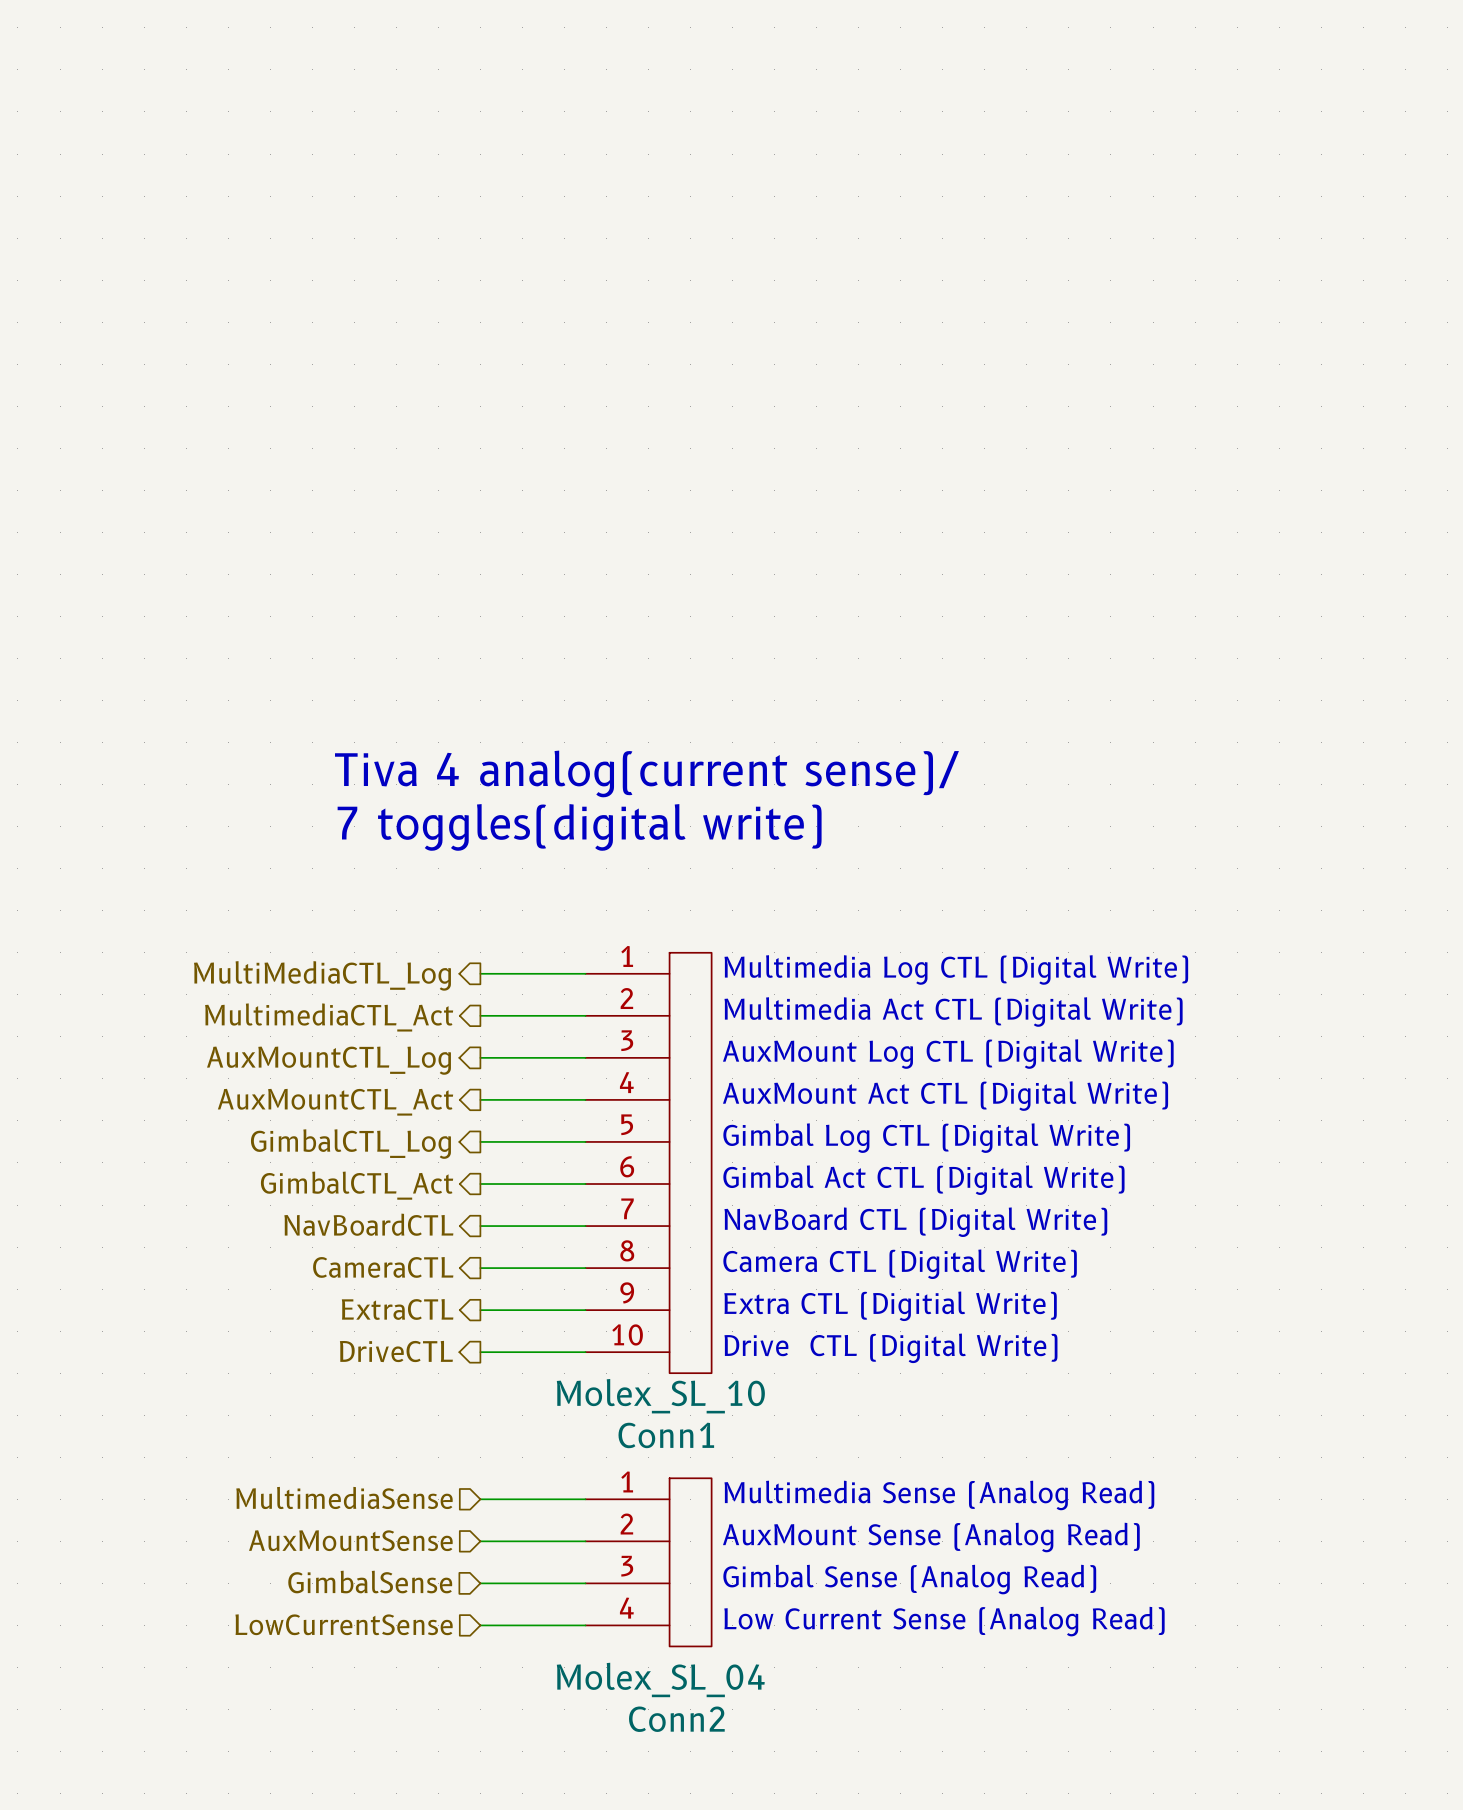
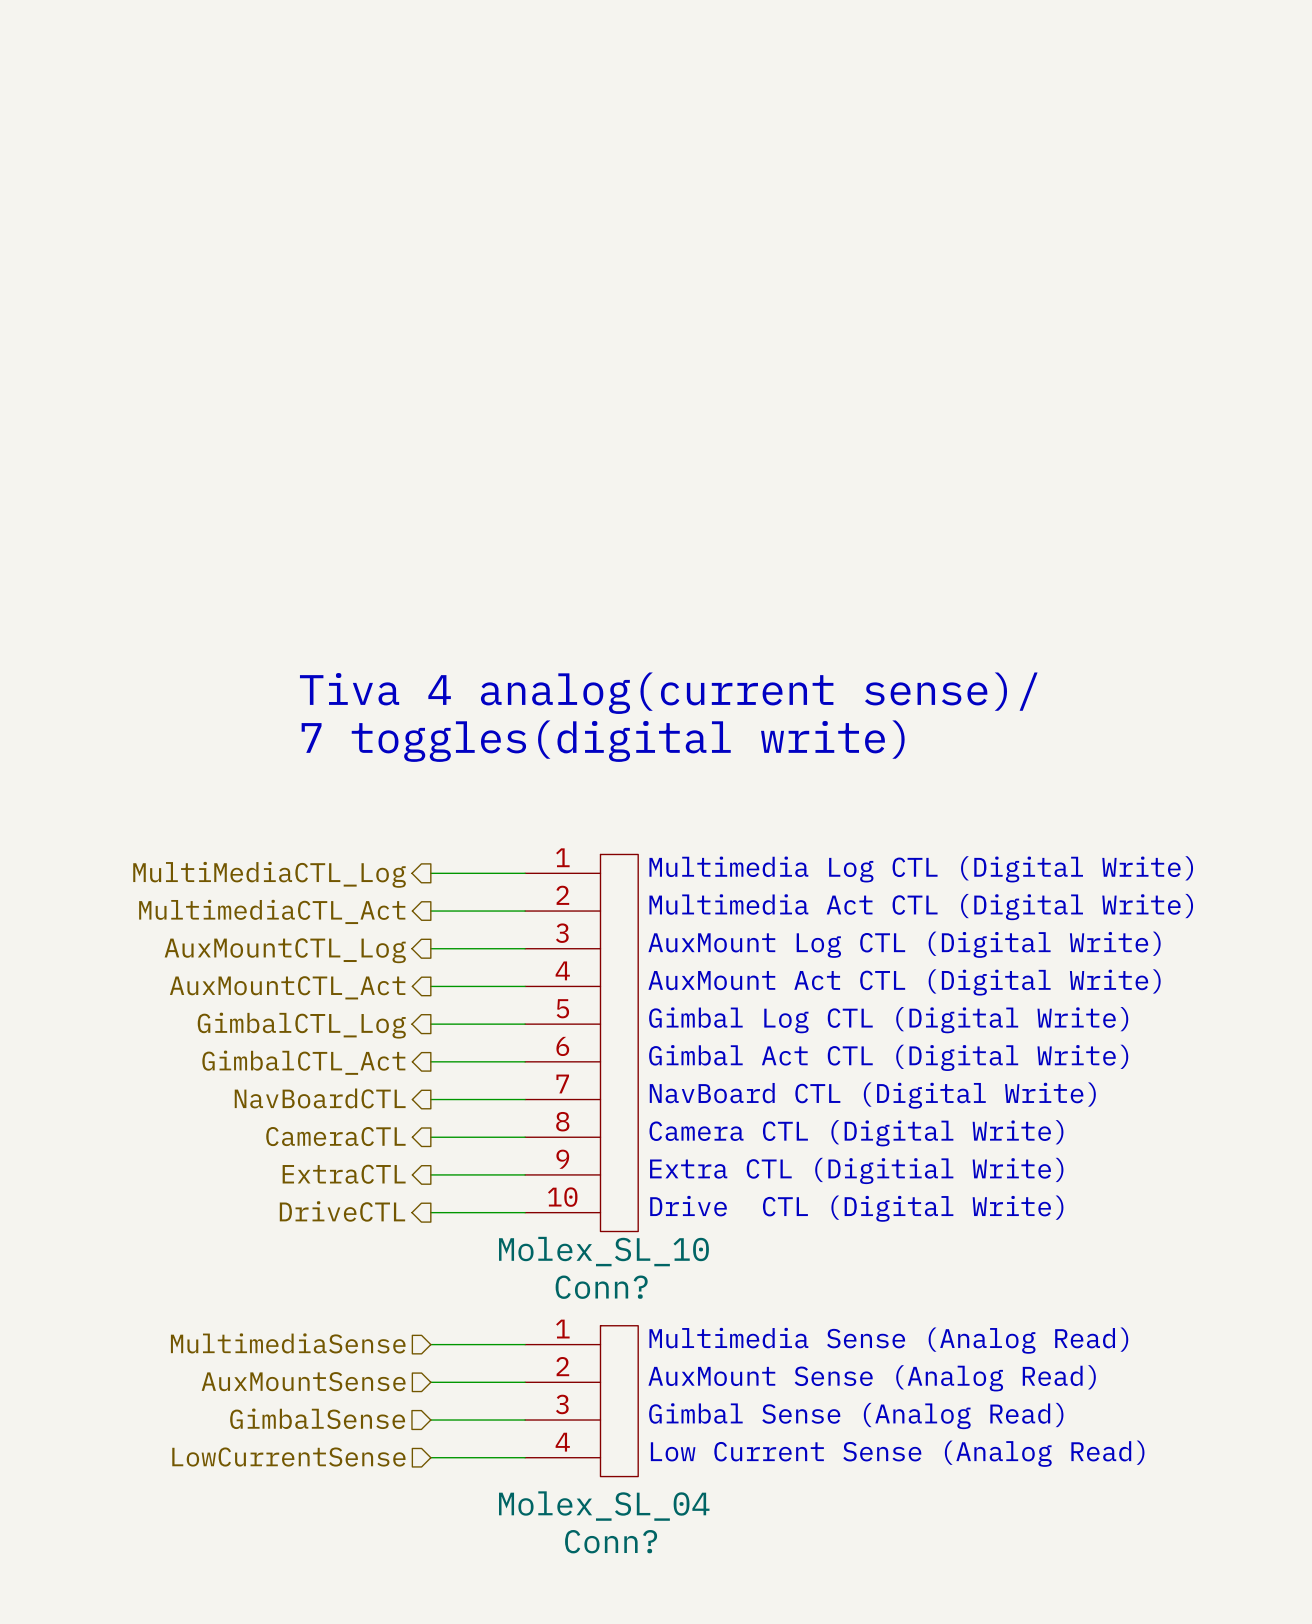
Conn1 name: Conn1 (666, 1435) -> Conn? (601, 1287)
Conn2 name: Conn2 (676, 1719) -> Conn? (611, 1541)

